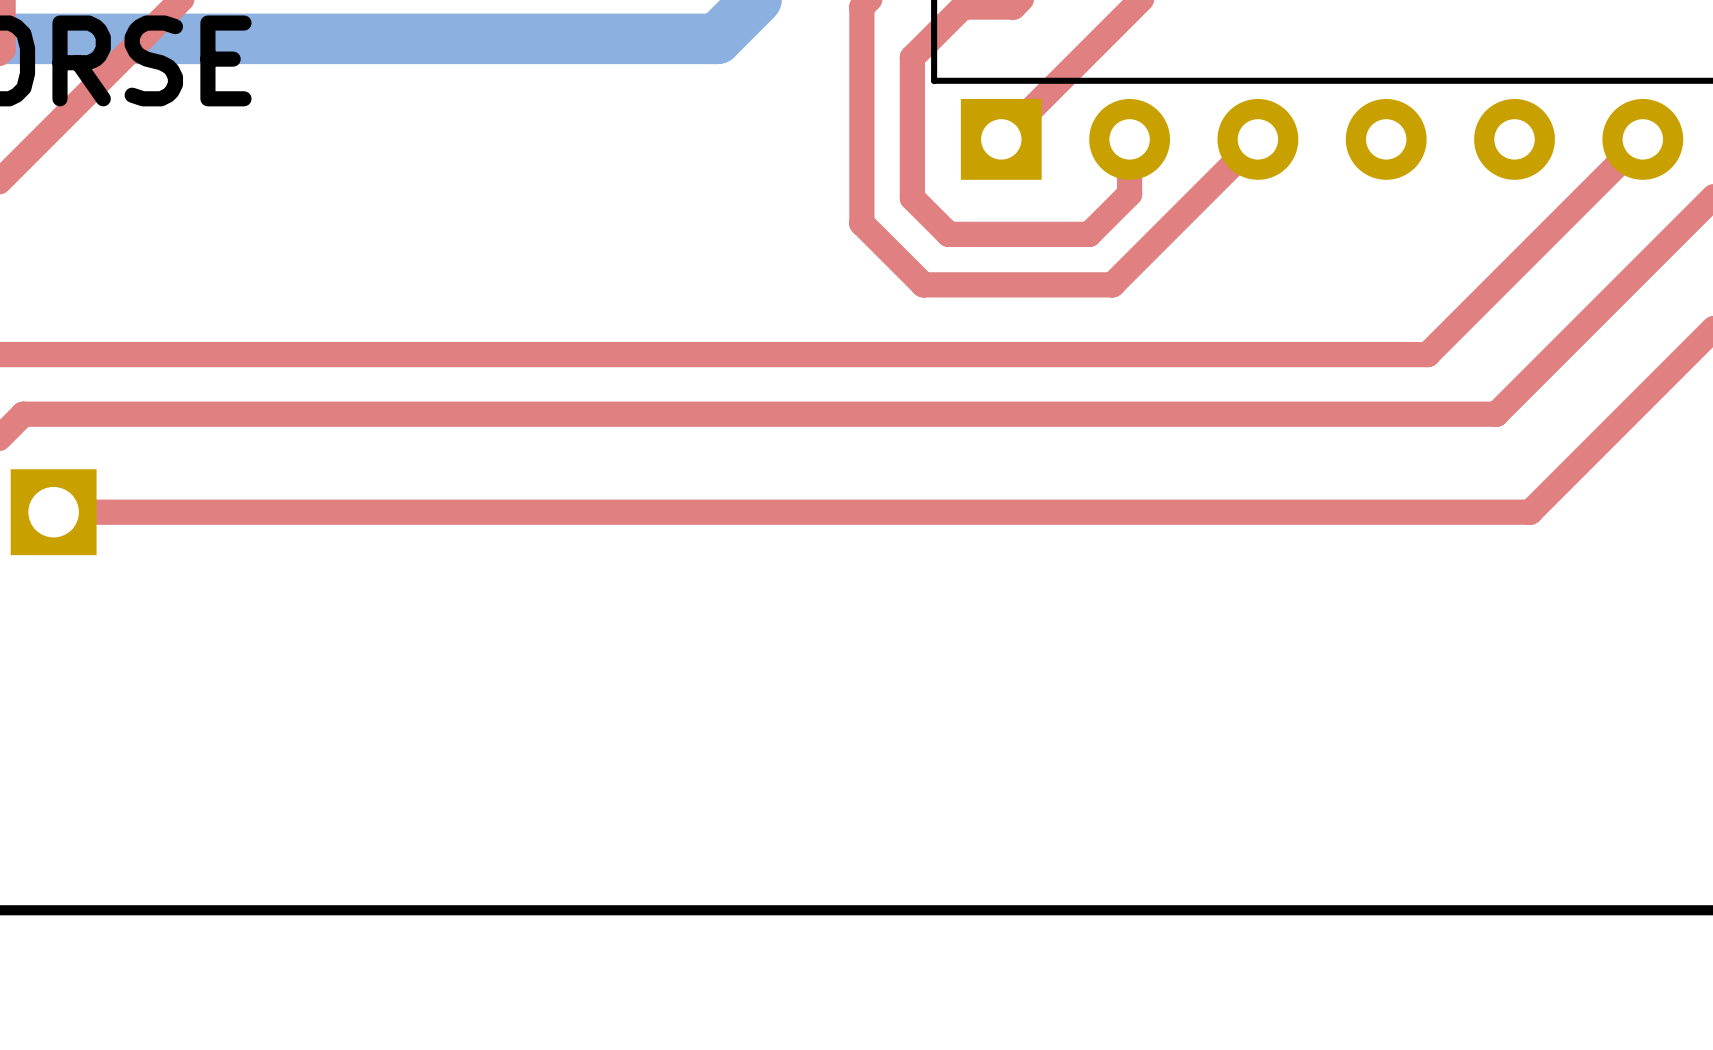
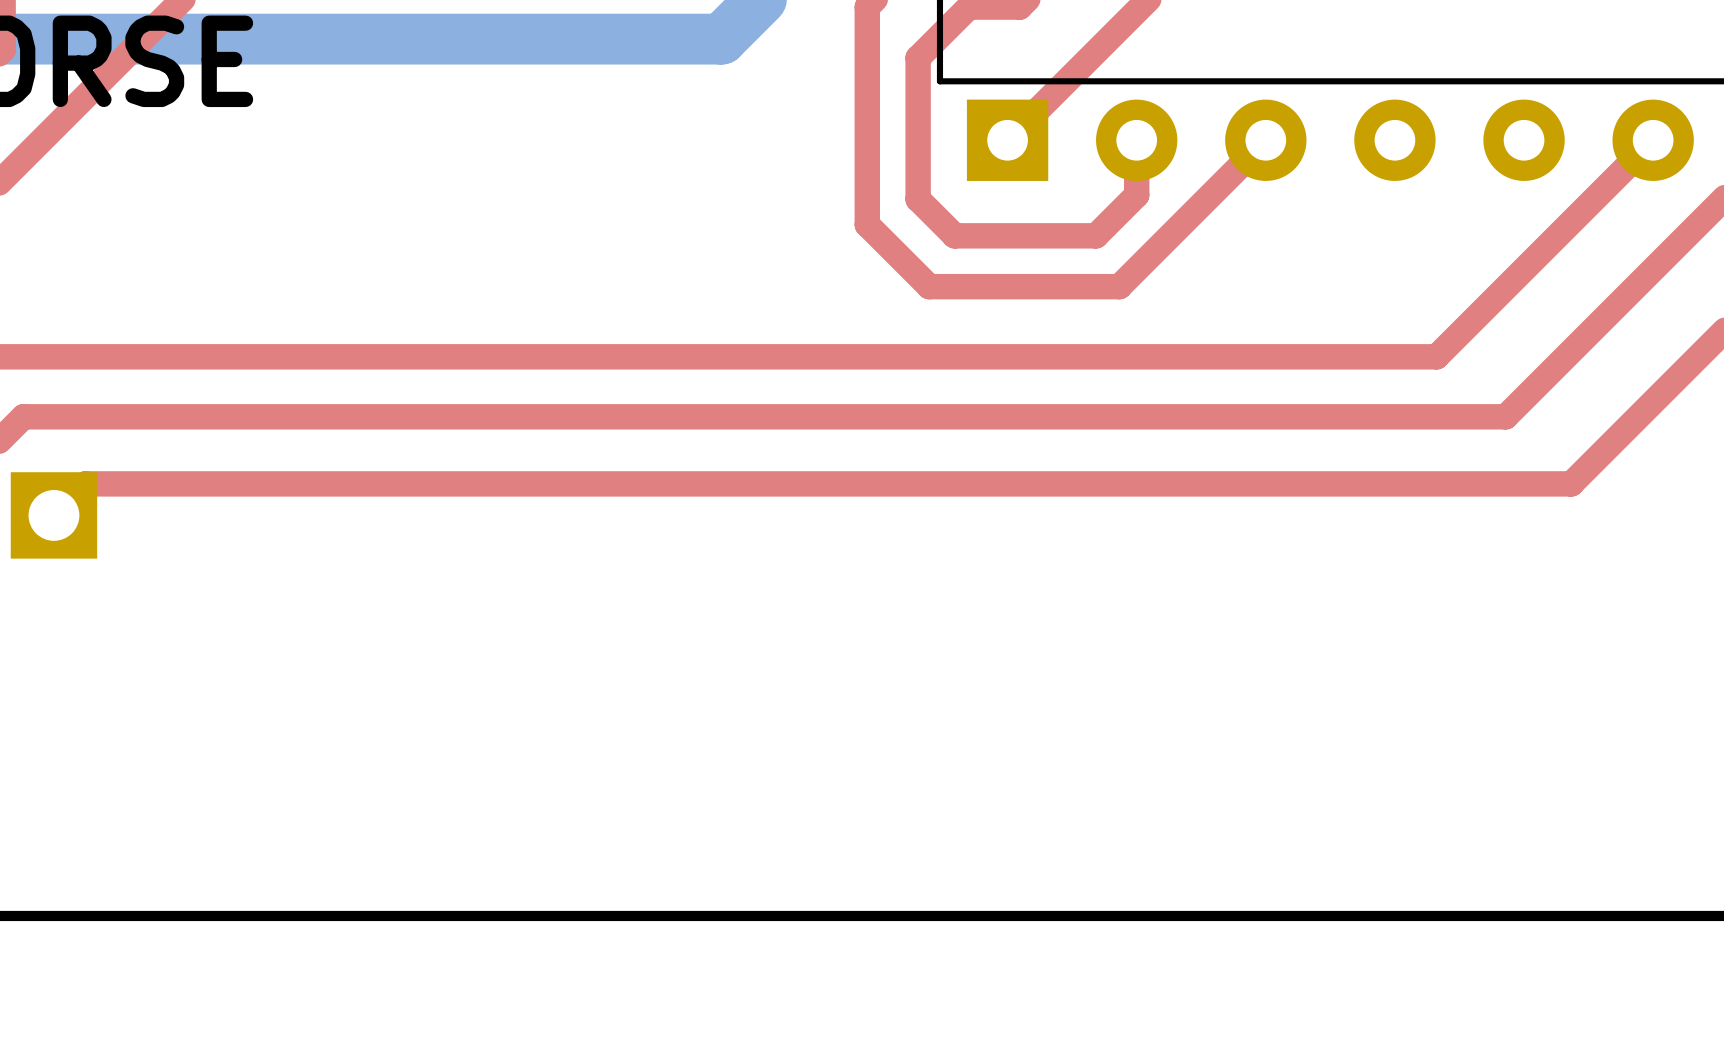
top track: (1561, 480) (1530, 512) (53, 512) -> (1571, 483) (85, 483) (53, 515)

